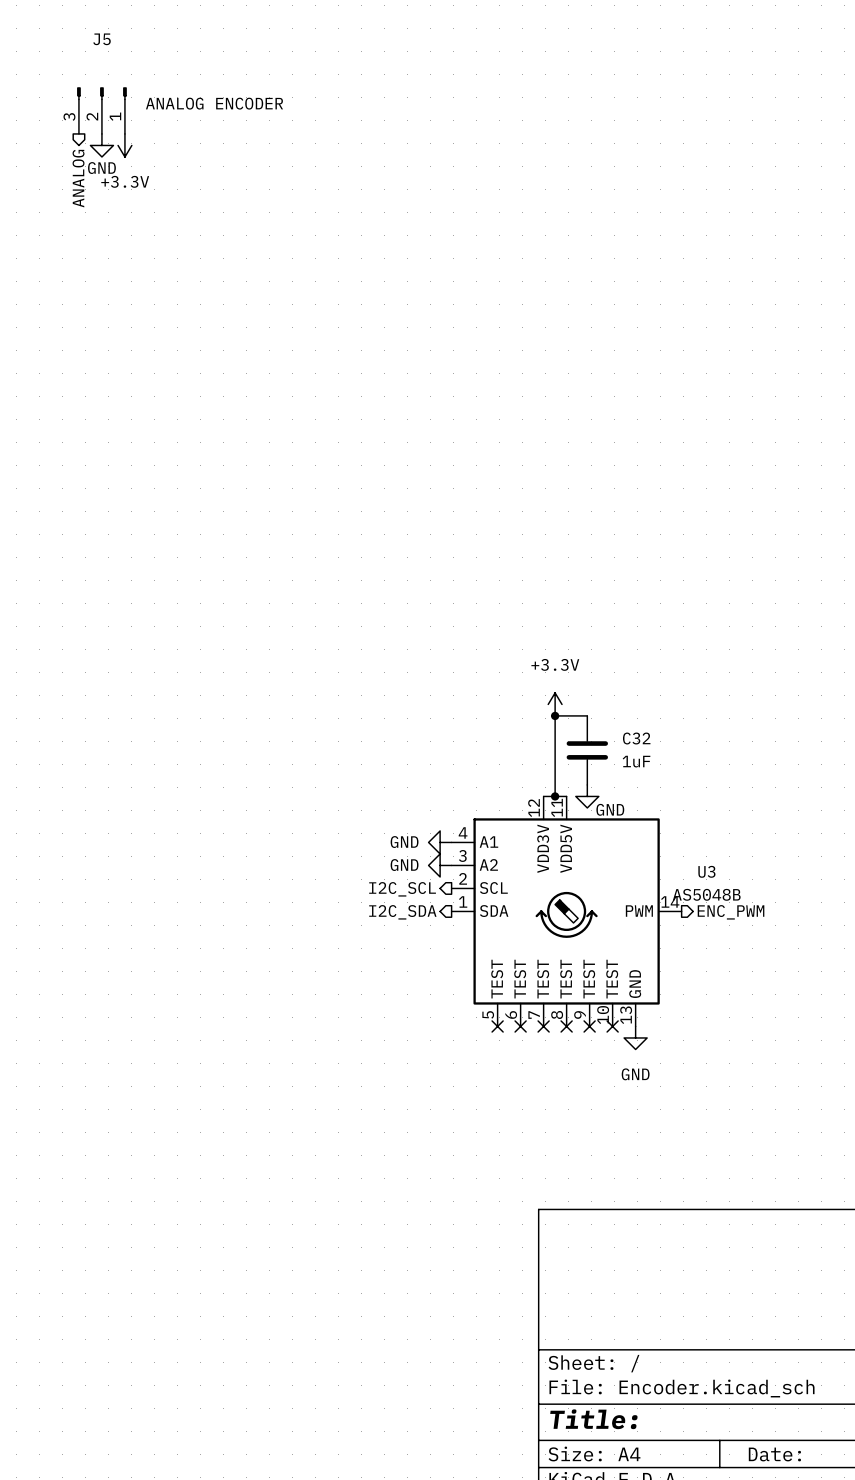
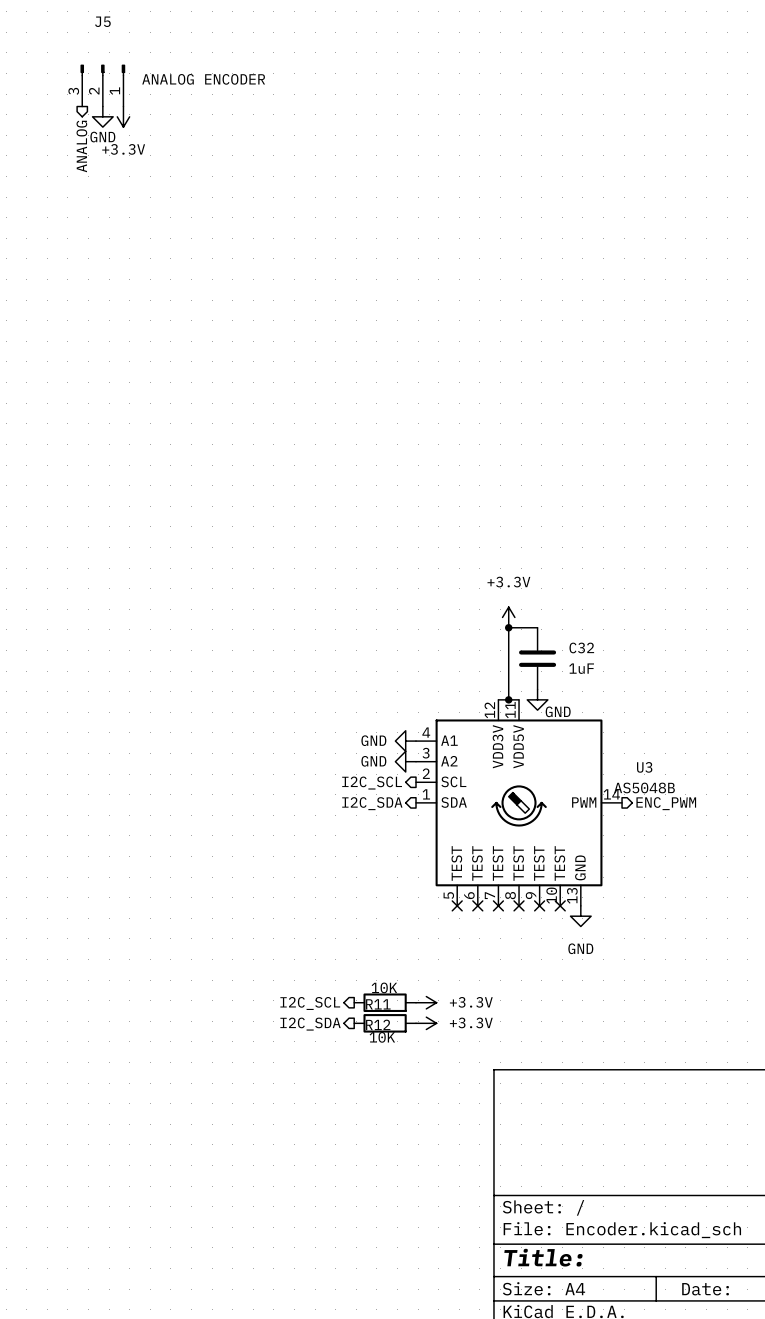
R11: none -> 10K (385, 1002)
power symbol: none -> +3.3V (426, 1002)
hierarchical label: none -> I2C_SCL (310, 1003)
R12: none -> 10K (385, 1023)
power symbol: none -> +3.3V (426, 1023)
hierarchical label: none -> I2C_SDA (310, 1024)

